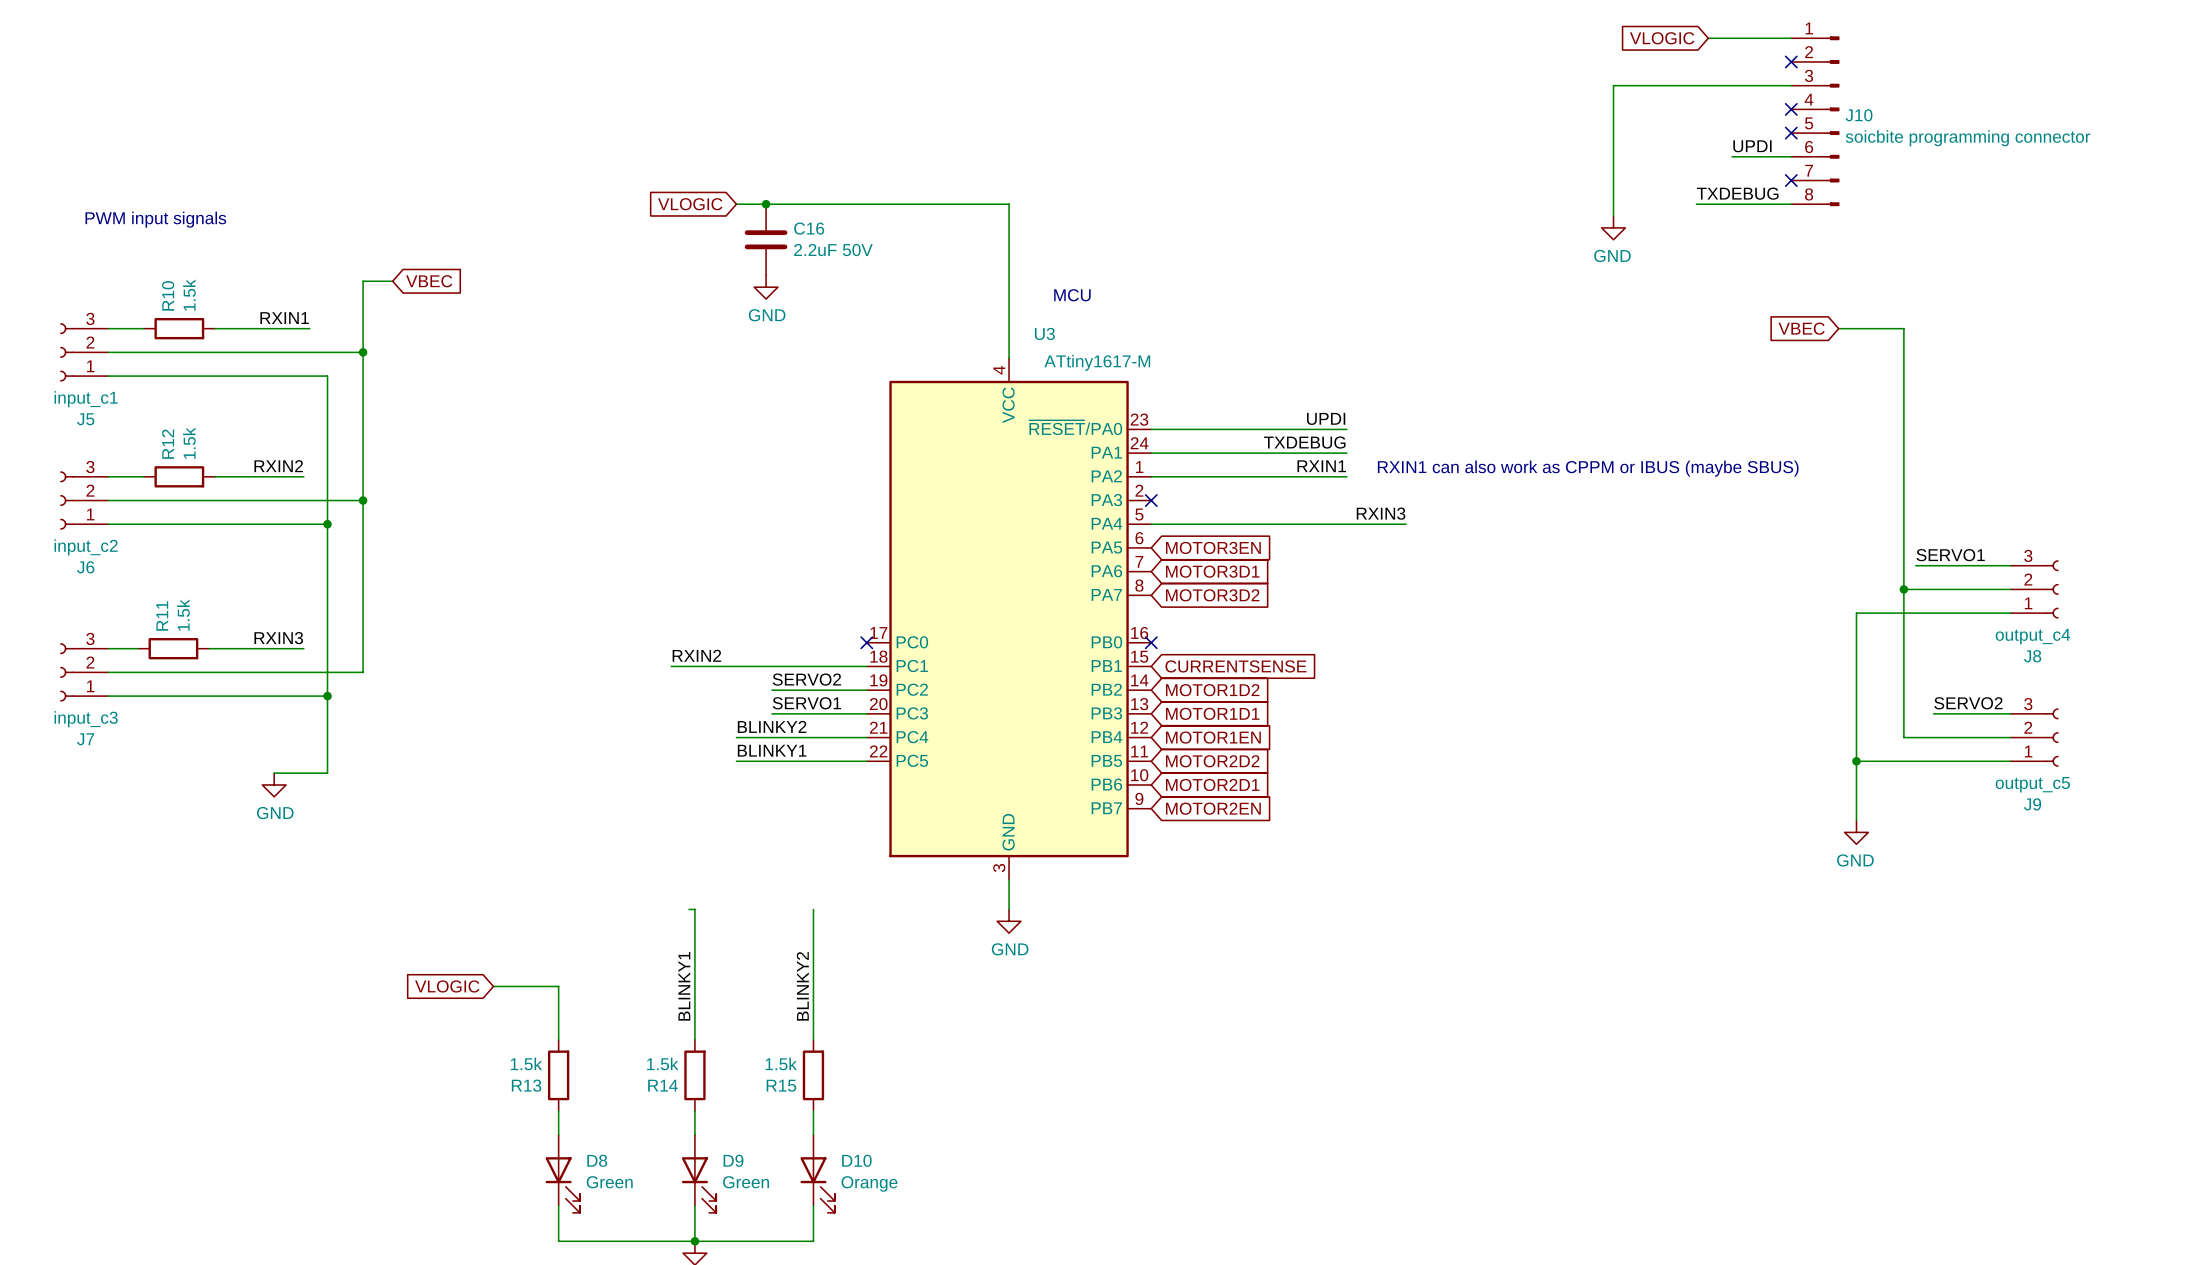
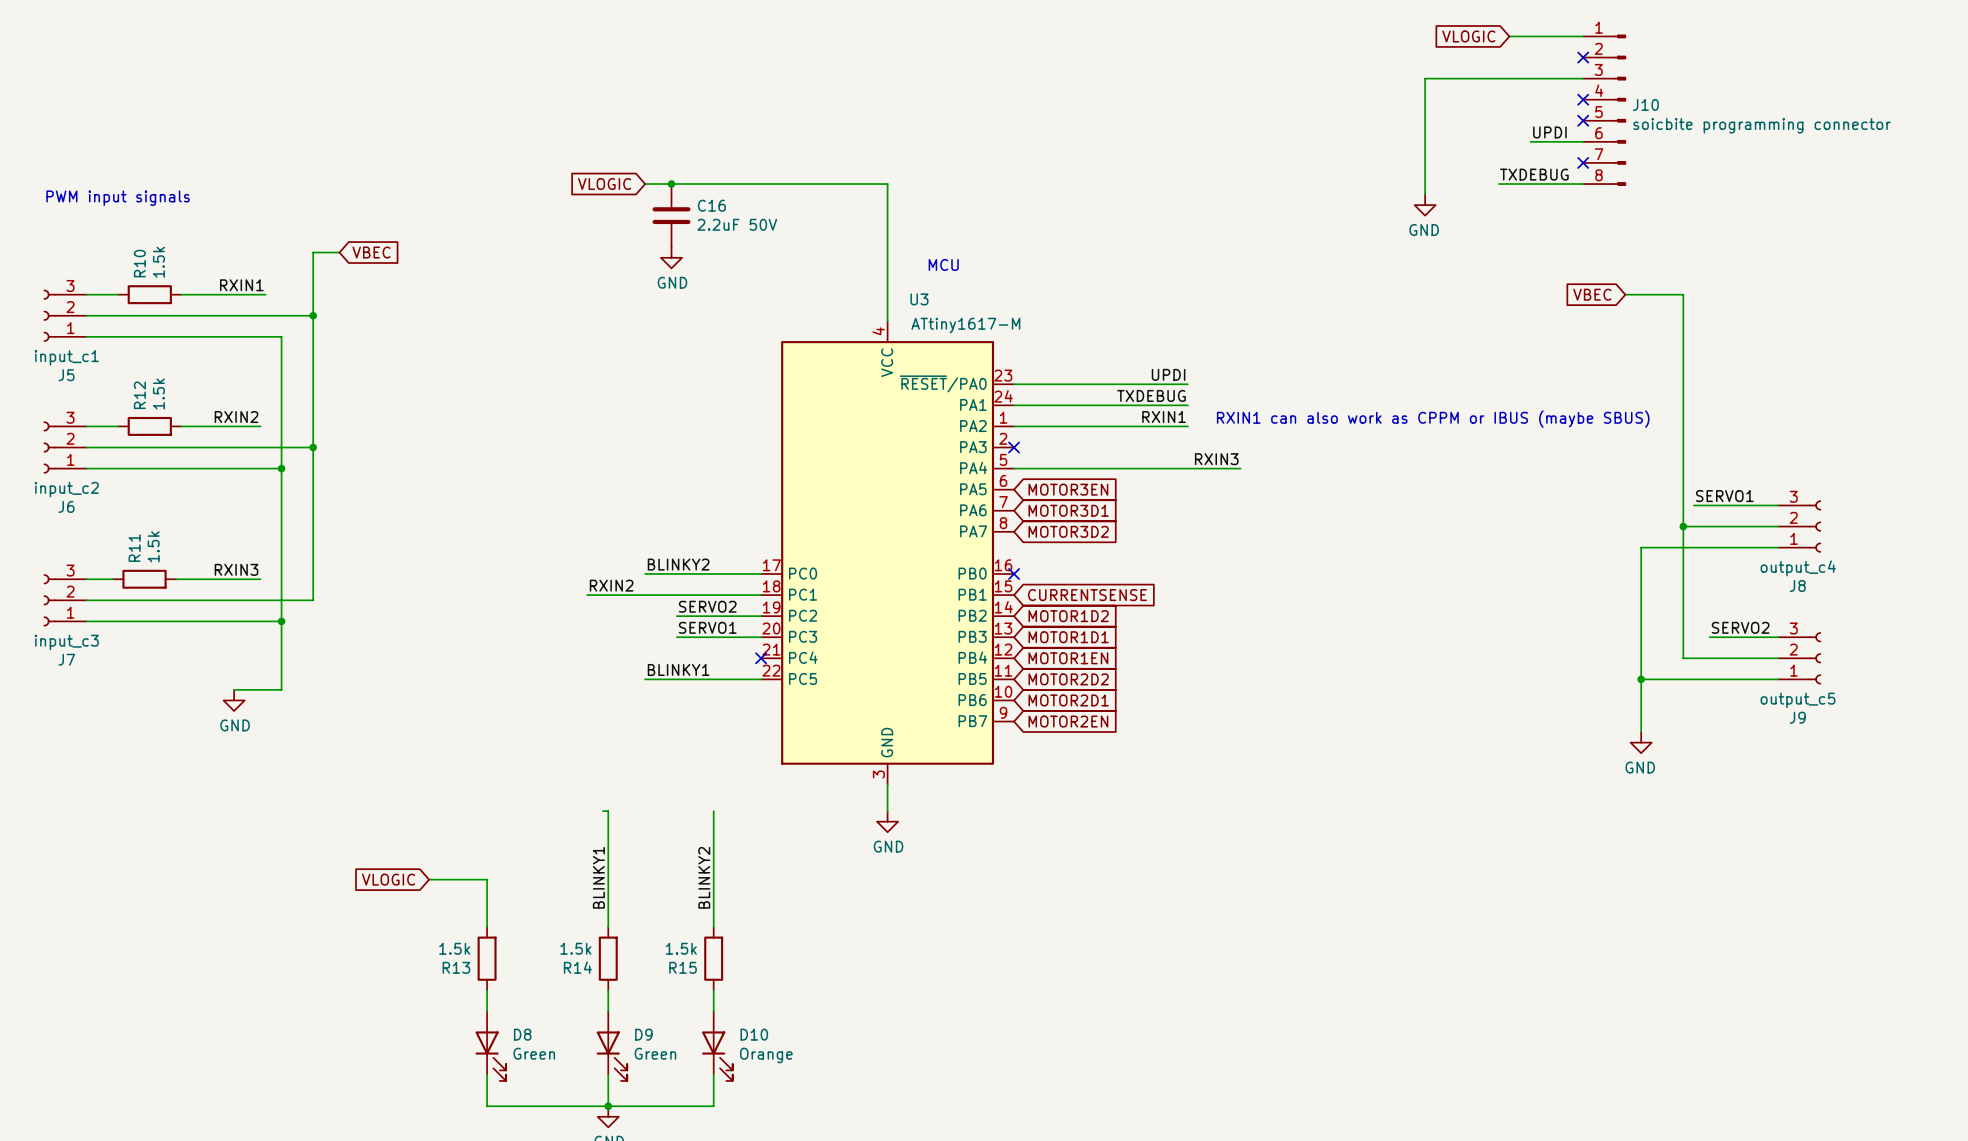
no-connect mark: (866, 642) -> none
label position: BLINKY2 (772, 726) -> BLINKY2 (678, 564)
wire: (736, 737) (866, 737) -> (645, 573) (761, 573)
no-connect mark: none -> (761, 658)

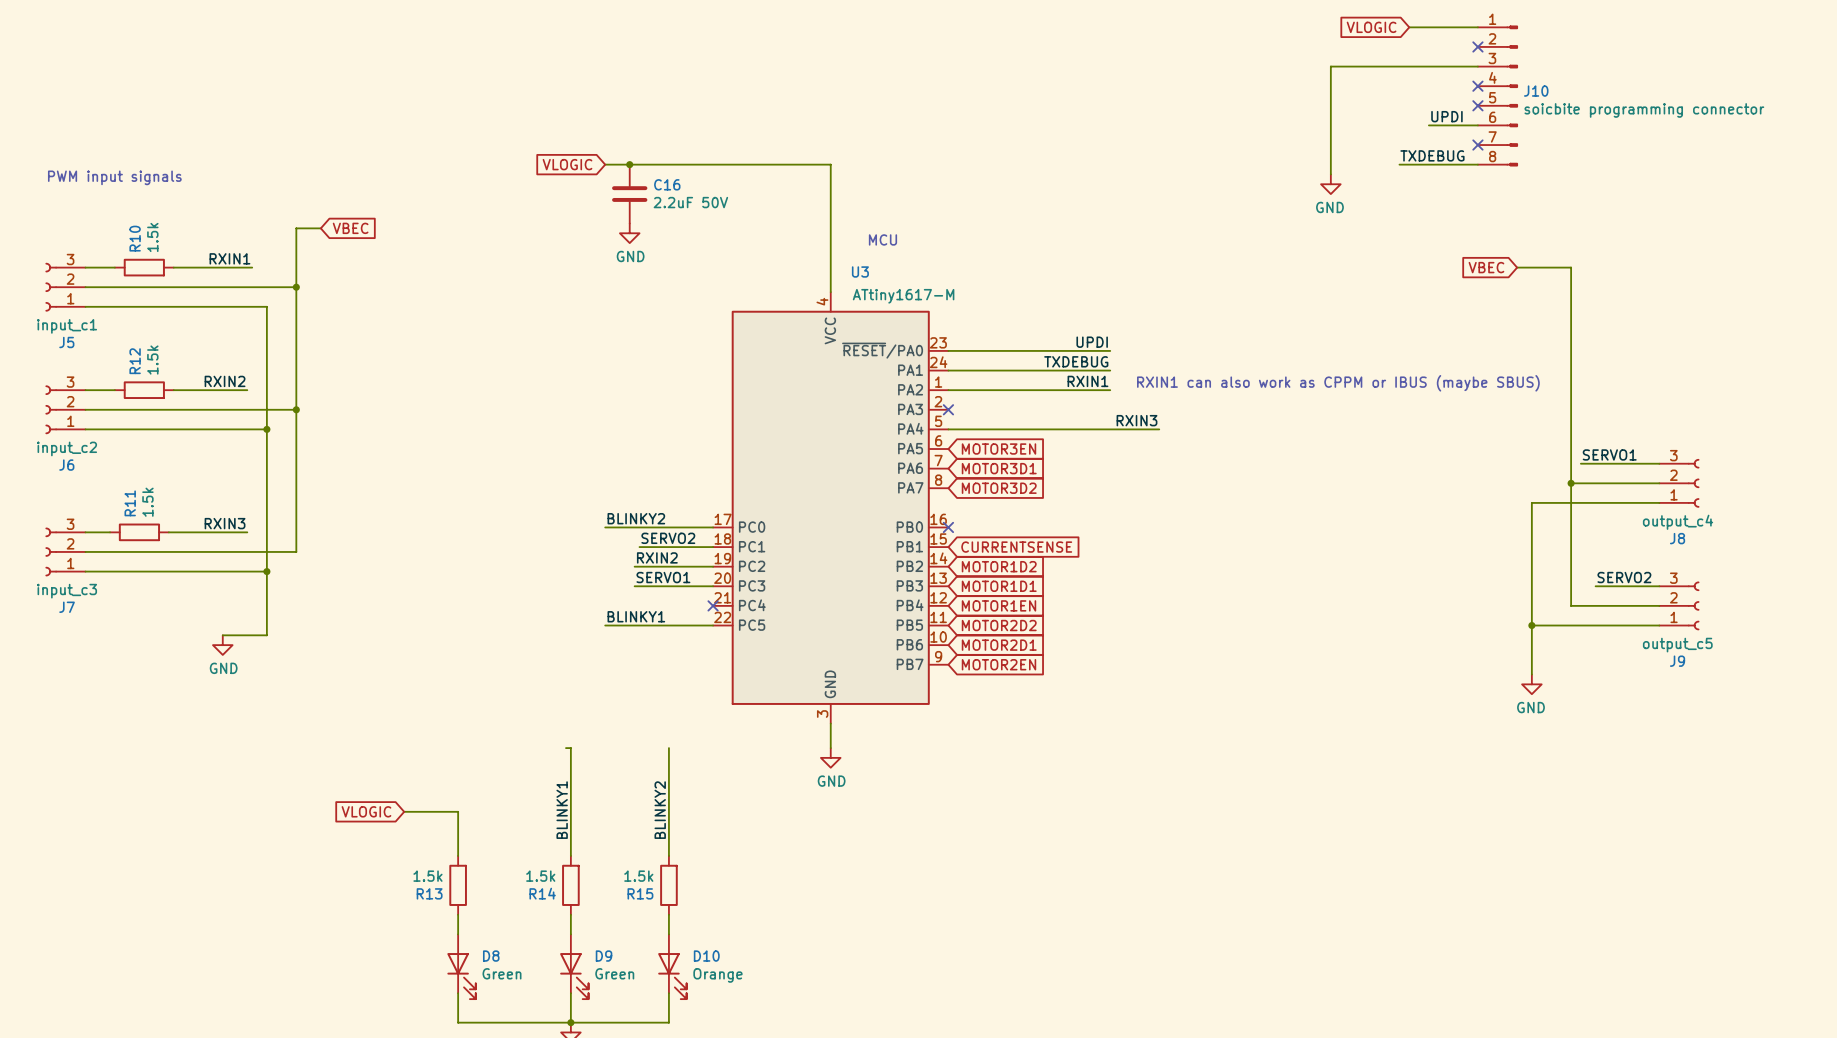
label: RXIN2 (611, 585) -> none
label: none -> SERVO2 (668, 538)
wire: (587, 595) (682, 595) -> none
label: SERVO2 (707, 606) -> RXIN2 (657, 557)

